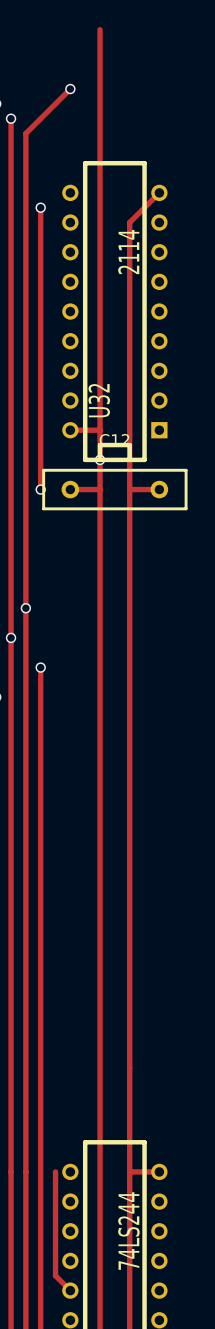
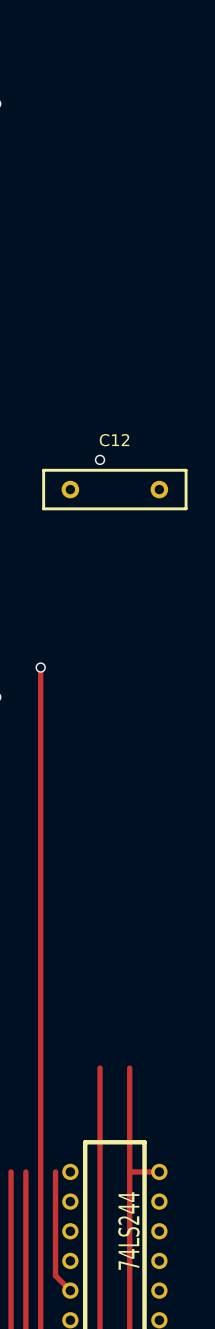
track: (100, 29) (100, 1068) -> none
track: (70, 89) (25, 133) (25, 1171) -> none
via: (70, 89) -> none
track: (11, 118) (11, 1171) -> none
via: (11, 118) -> none
track: (159, 192) (129, 222) (129, 1068) -> none
track: (40, 207) (40, 489) -> none
via: (40, 207) -> none
U32: 2114 (114, 311) -> none
track: (70, 430) (100, 430) -> none
via: (40, 489) -> none
track: (70, 489) (100, 489) -> none
track: (129, 489) (159, 489) -> none
via: (25, 608) -> none
via: (11, 637) -> none

